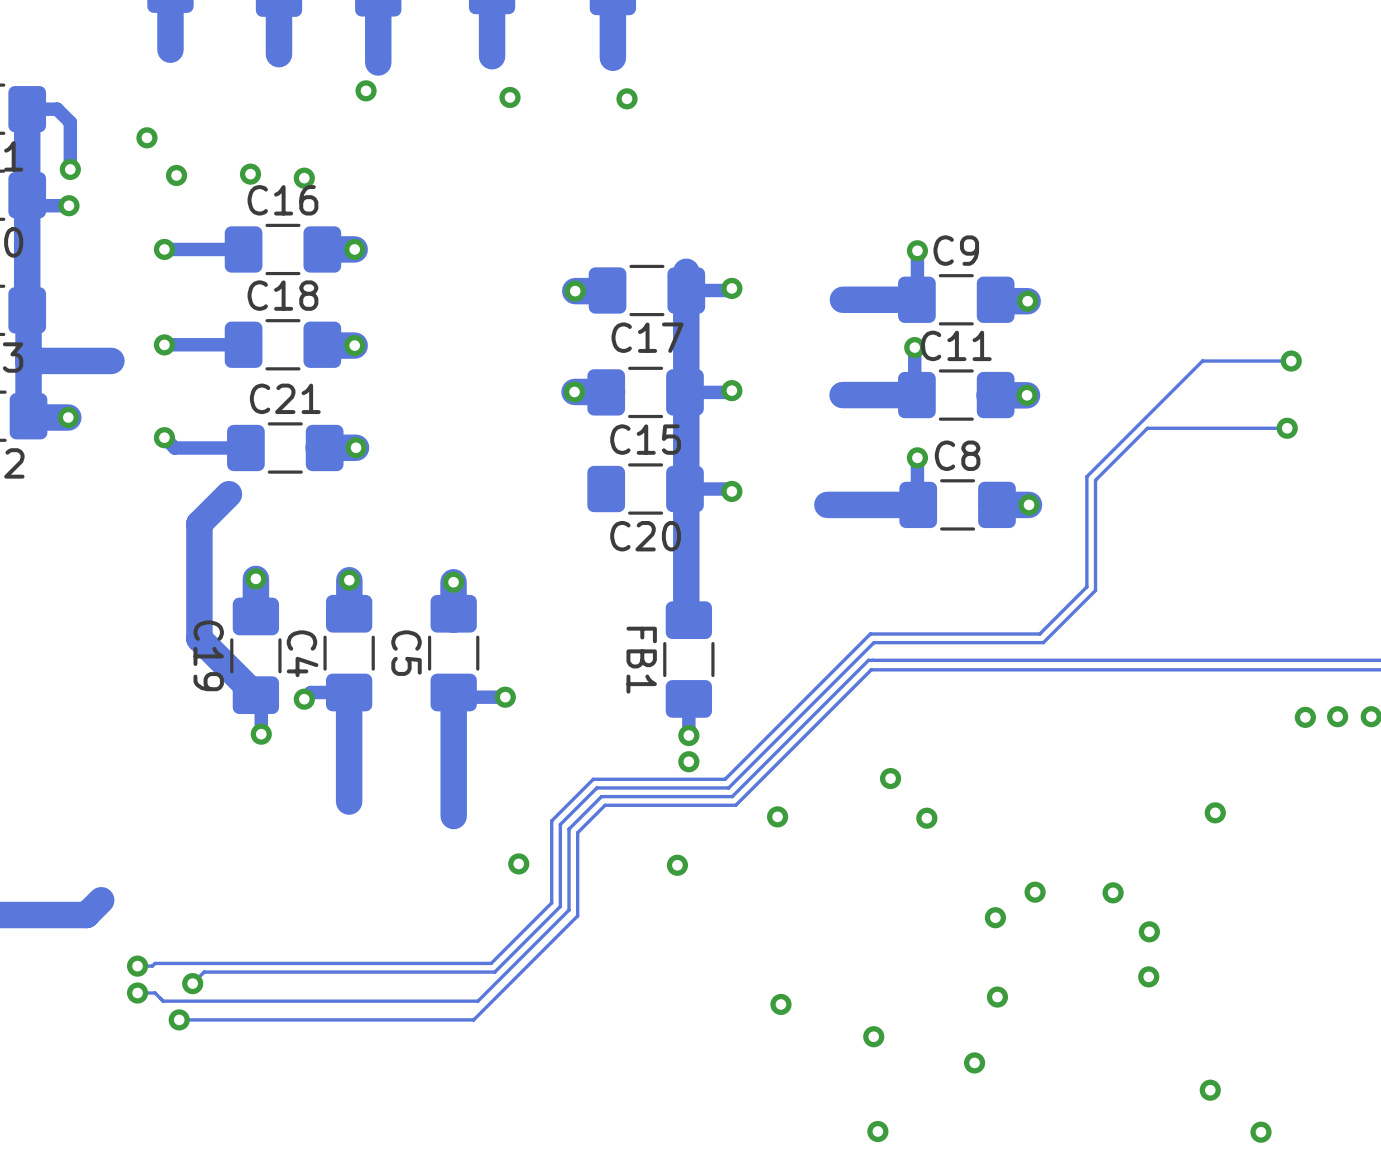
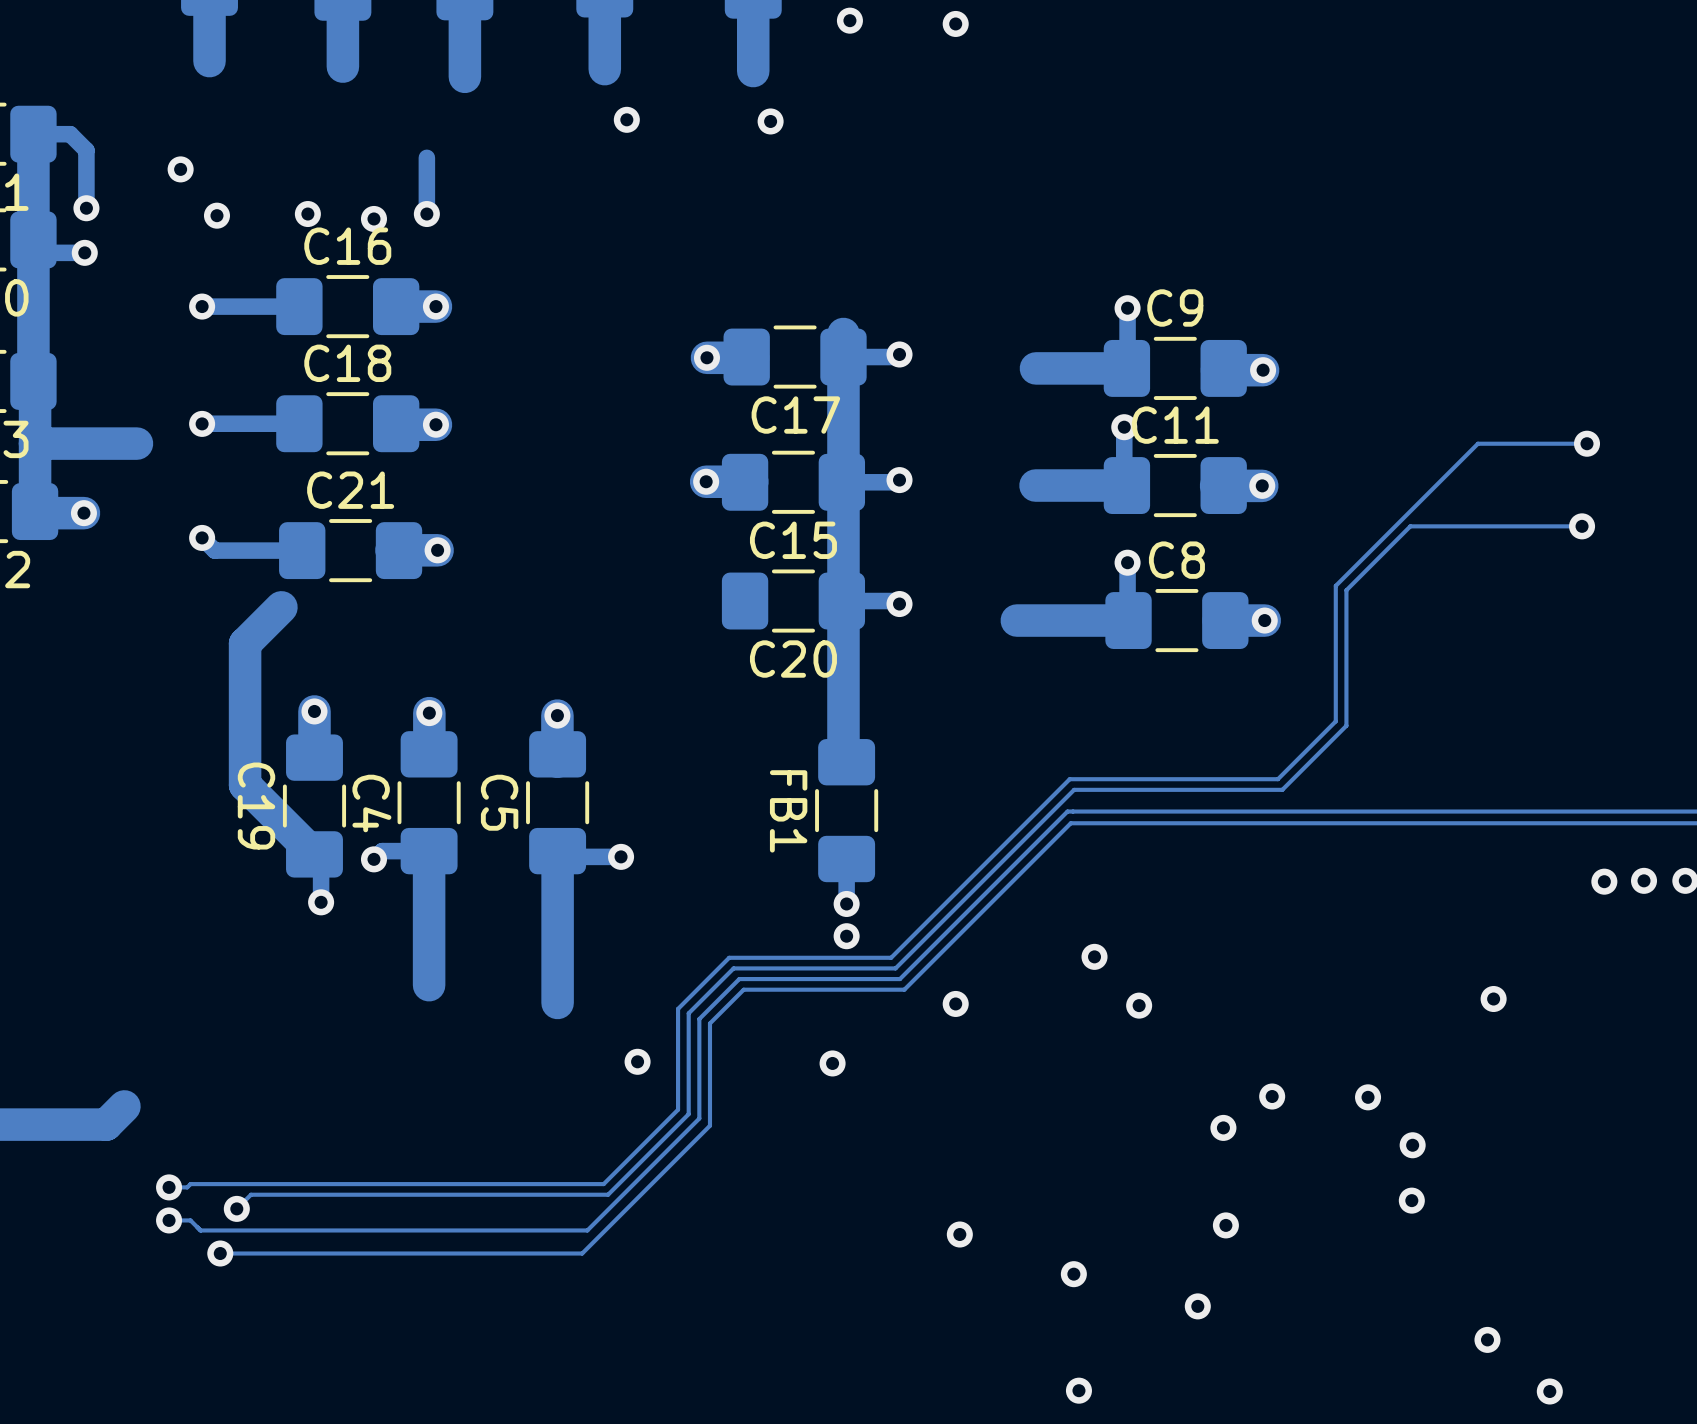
via: none -> (849, 20)
via: none -> (955, 23)
via position: (366, 90) -> (426, 214)
track: none -> (426, 157) (426, 214)

